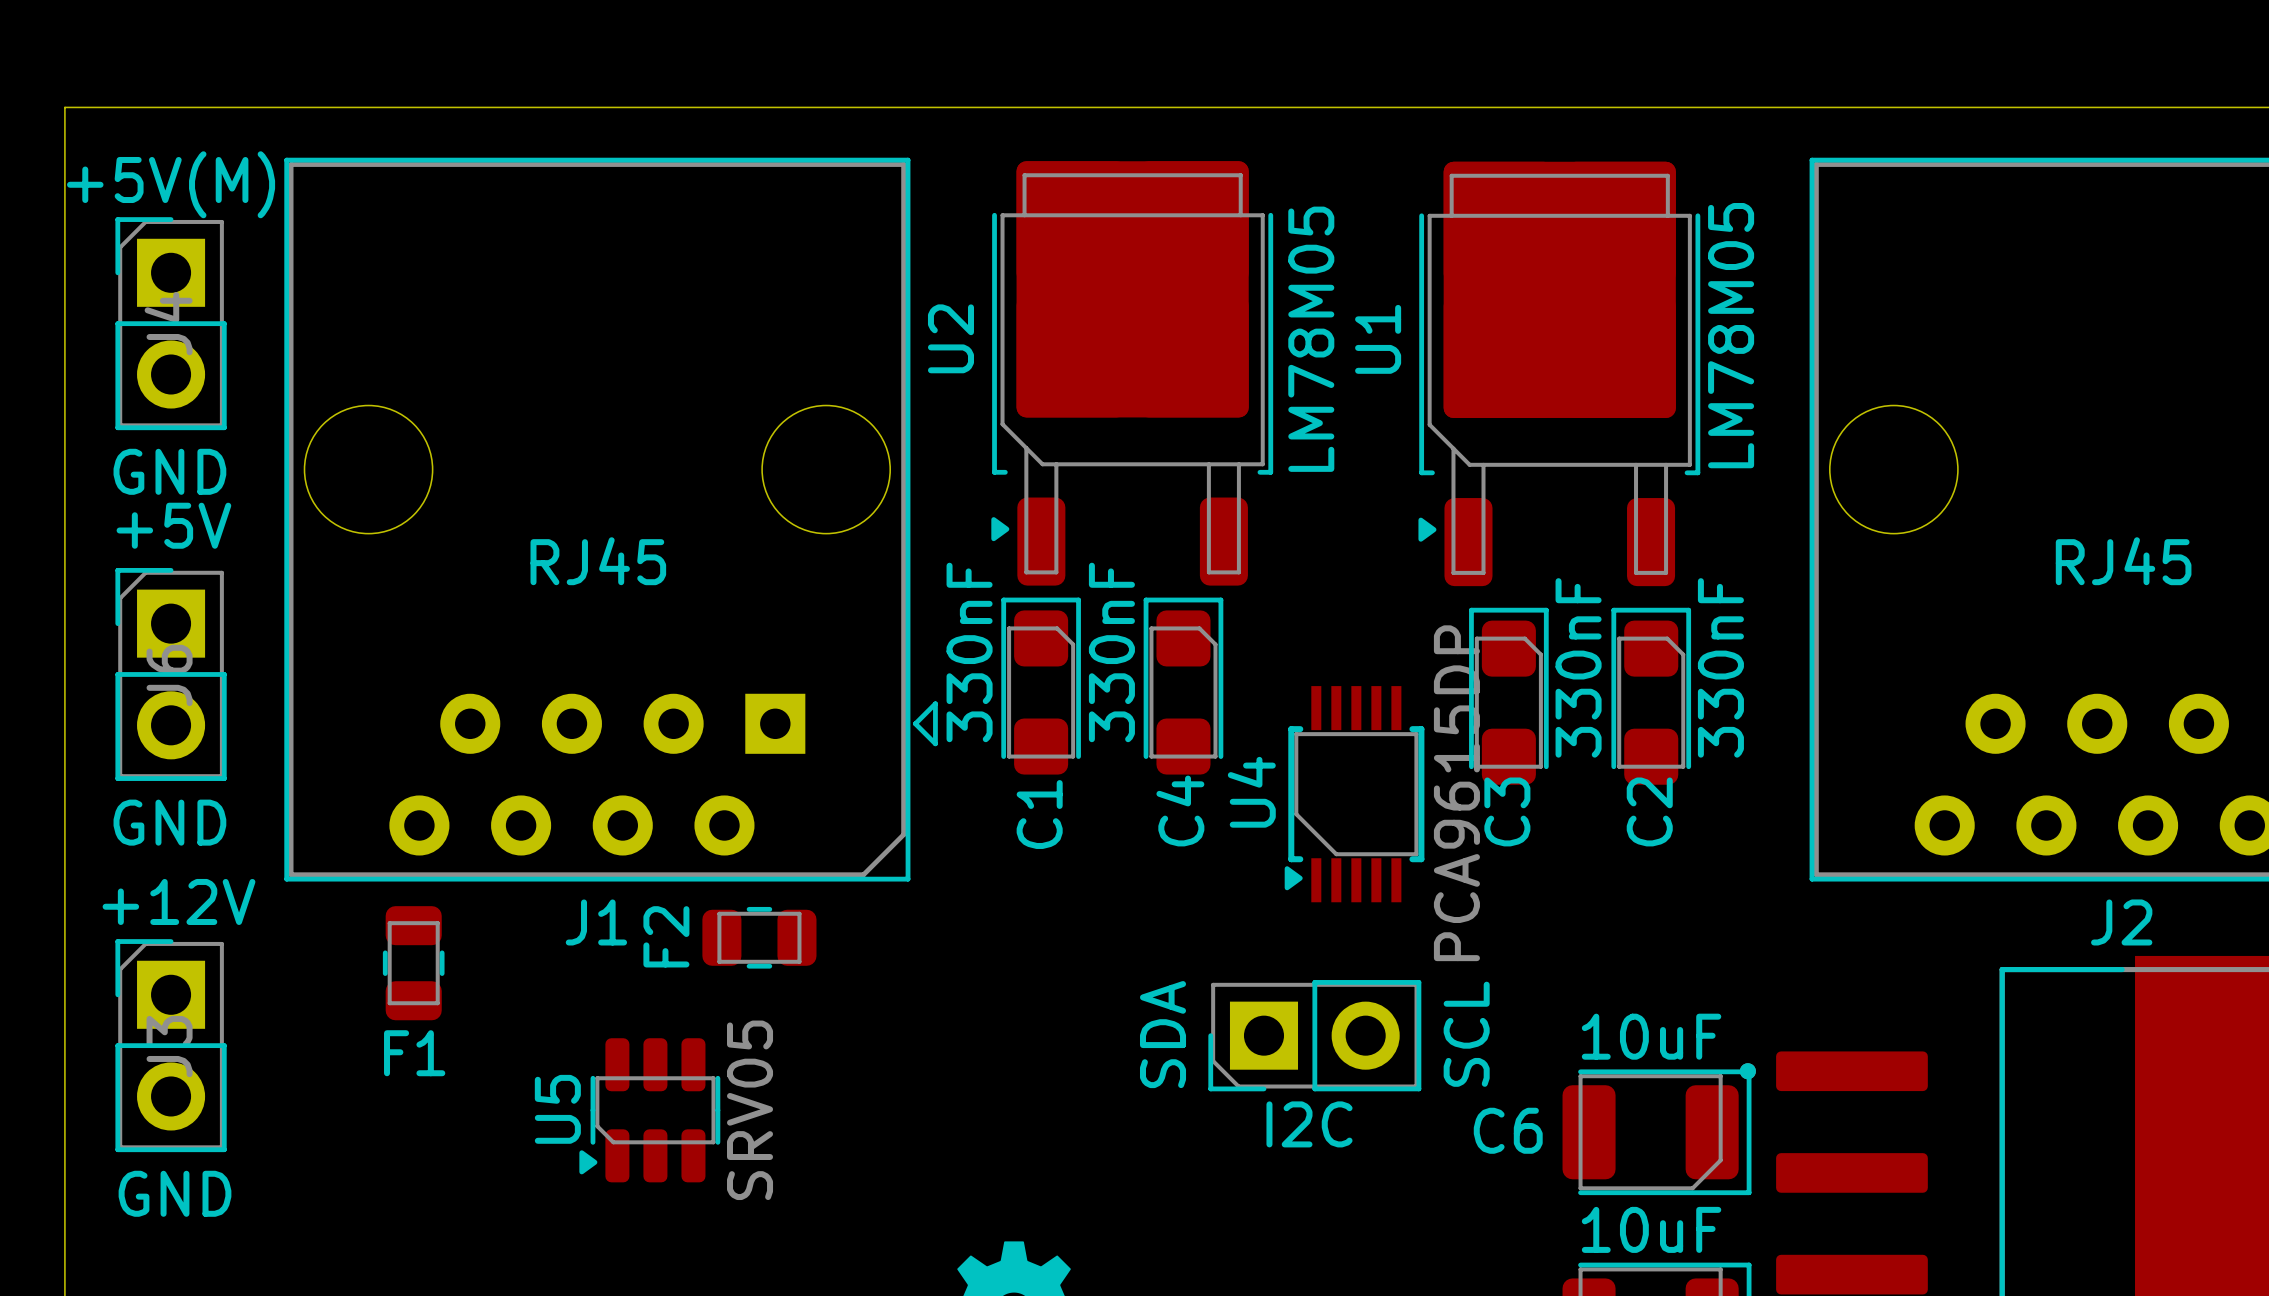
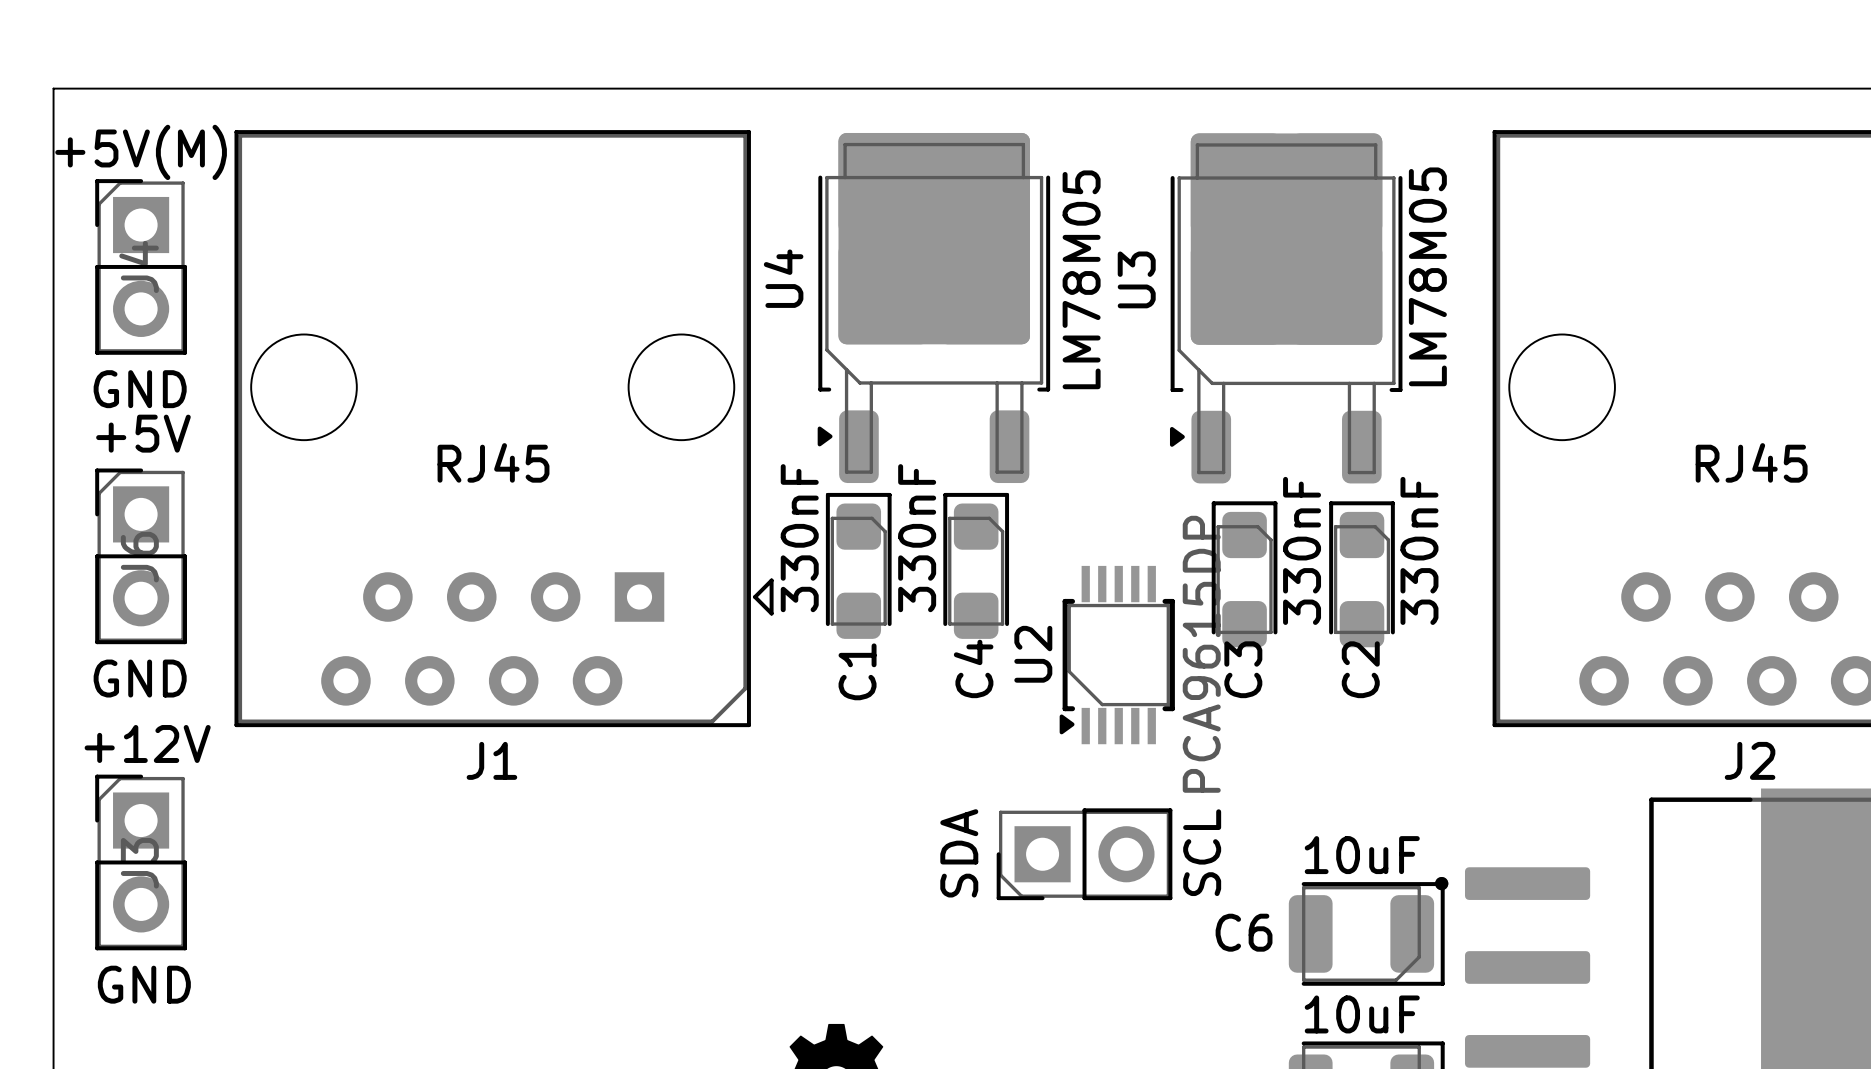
U2 name: U2 (950, 338) -> U4 (783, 278)
U1 name: U1 (1378, 339) -> U3 (1136, 279)
U4 name: U4 (1251, 792) -> U2 (1033, 654)
F2: (759, 937) -> none
F1: (413, 963) -> none
text: SCL (1466, 1034) -> none
U5: SRV05 (649, 1110) -> none
part value: I2C (1309, 1124) -> SCL (1202, 852)

